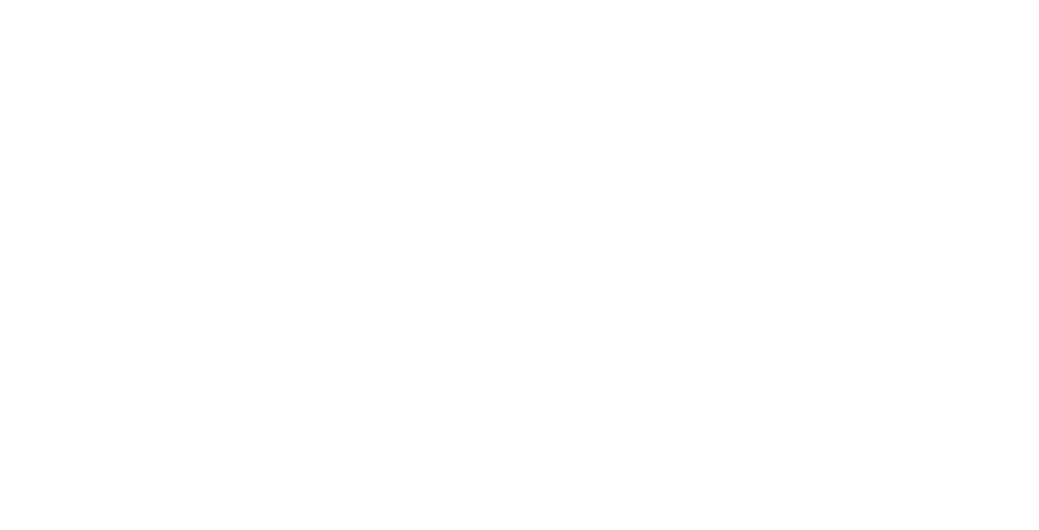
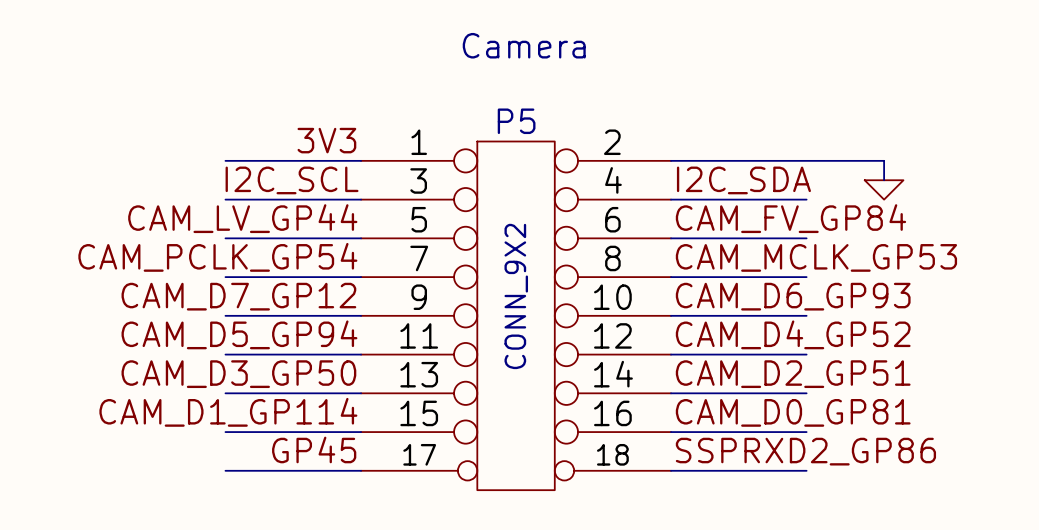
text: none -> Camera (524, 45)
label: none -> 3V3 (326, 140)
wire: none -> (225, 160) (361, 160)
wire: none -> (671, 160) (884, 160) (884, 180)
label: none -> I2C_SCL (292, 180)
label: none -> I2C_SDA (743, 180)
power symbol: none -> (884, 189)
wire: none -> (225, 199) (361, 199)
wire: none -> (671, 199) (806, 199)
label: none -> CAM_LV_GP44 (242, 218)
label: none -> CAM_FV_GP84 (790, 218)
wire: none -> (225, 238) (361, 238)
wire: none -> (671, 238) (806, 238)
label: none -> CAM_PCLK_GP54 (217, 257)
label: none -> CAM_MCLK_GP53 (816, 257)
wire: none -> (225, 277) (361, 277)
wire: none -> (671, 277) (806, 277)
label: none -> CAM_D7_GP12 (238, 296)
label: none -> CAM_D6_GP93 (793, 296)
wire: none -> (225, 315) (361, 315)
P5: none -> CONN_9X2 (516, 315)
wire: none -> (671, 315) (806, 315)
label: none -> CAM_D5_GP94 (239, 334)
label: none -> CAM_D4_GP52 (793, 334)
wire: none -> (225, 354) (361, 354)
wire: none -> (671, 354) (806, 354)
label: none -> CAM_D3_GP50 (238, 374)
label: none -> CAM_D2_GP51 (793, 374)
wire: none -> (225, 393) (361, 393)
wire: none -> (671, 393) (806, 393)
label: none -> CAM_D1_GP114 (228, 412)
label: none -> CAM_D0_GP81 (793, 412)
wire: none -> (225, 432) (361, 432)
wire: none -> (671, 432) (806, 432)
label: none -> GP45 (314, 449)
label: none -> SSPRXD2_GP86 (805, 451)
wire: none -> (225, 470) (361, 470)
wire: none -> (671, 470) (806, 470)

